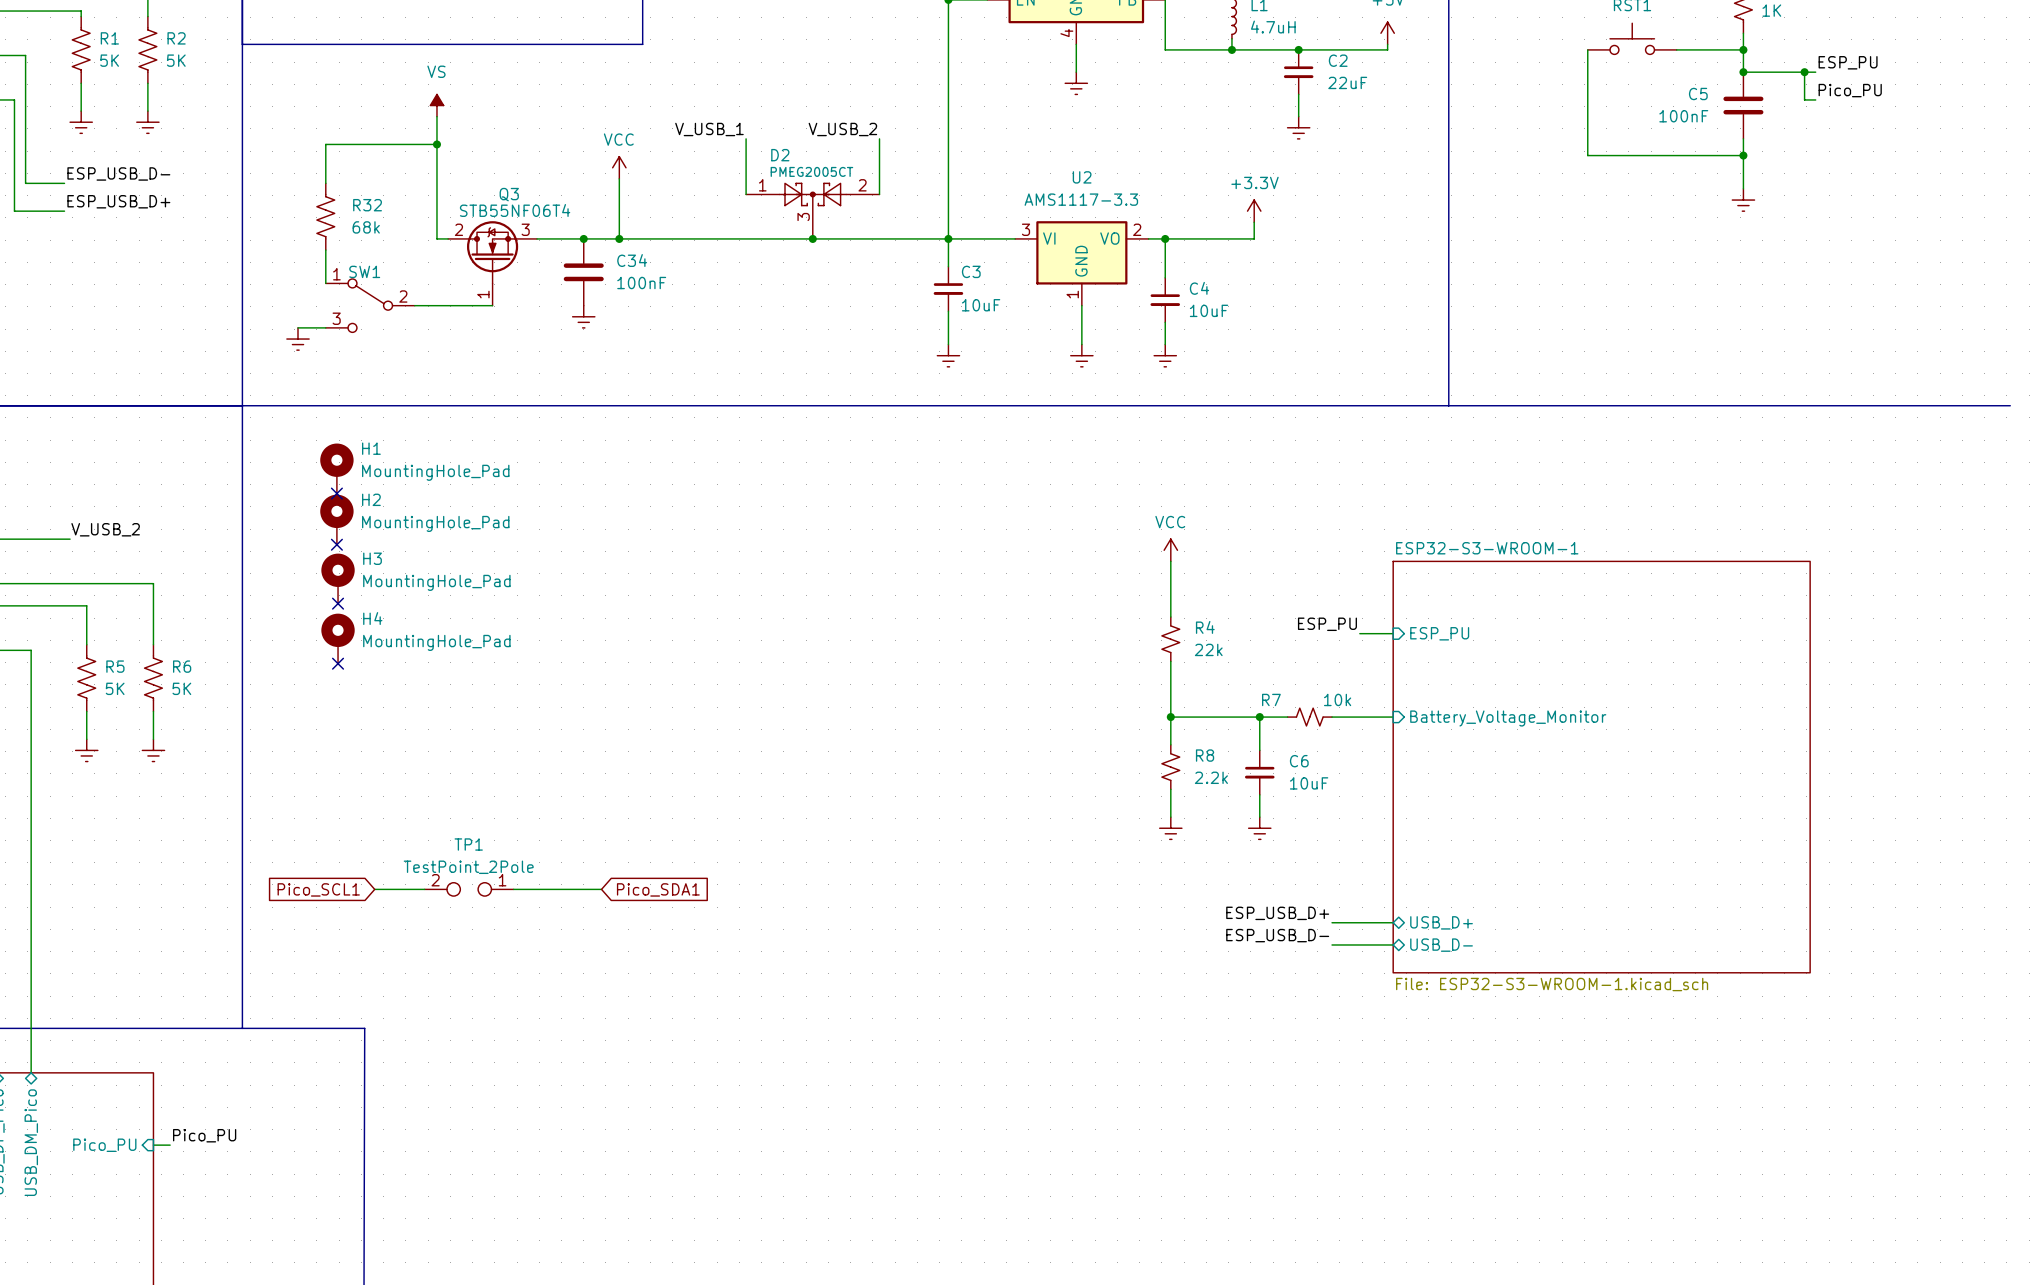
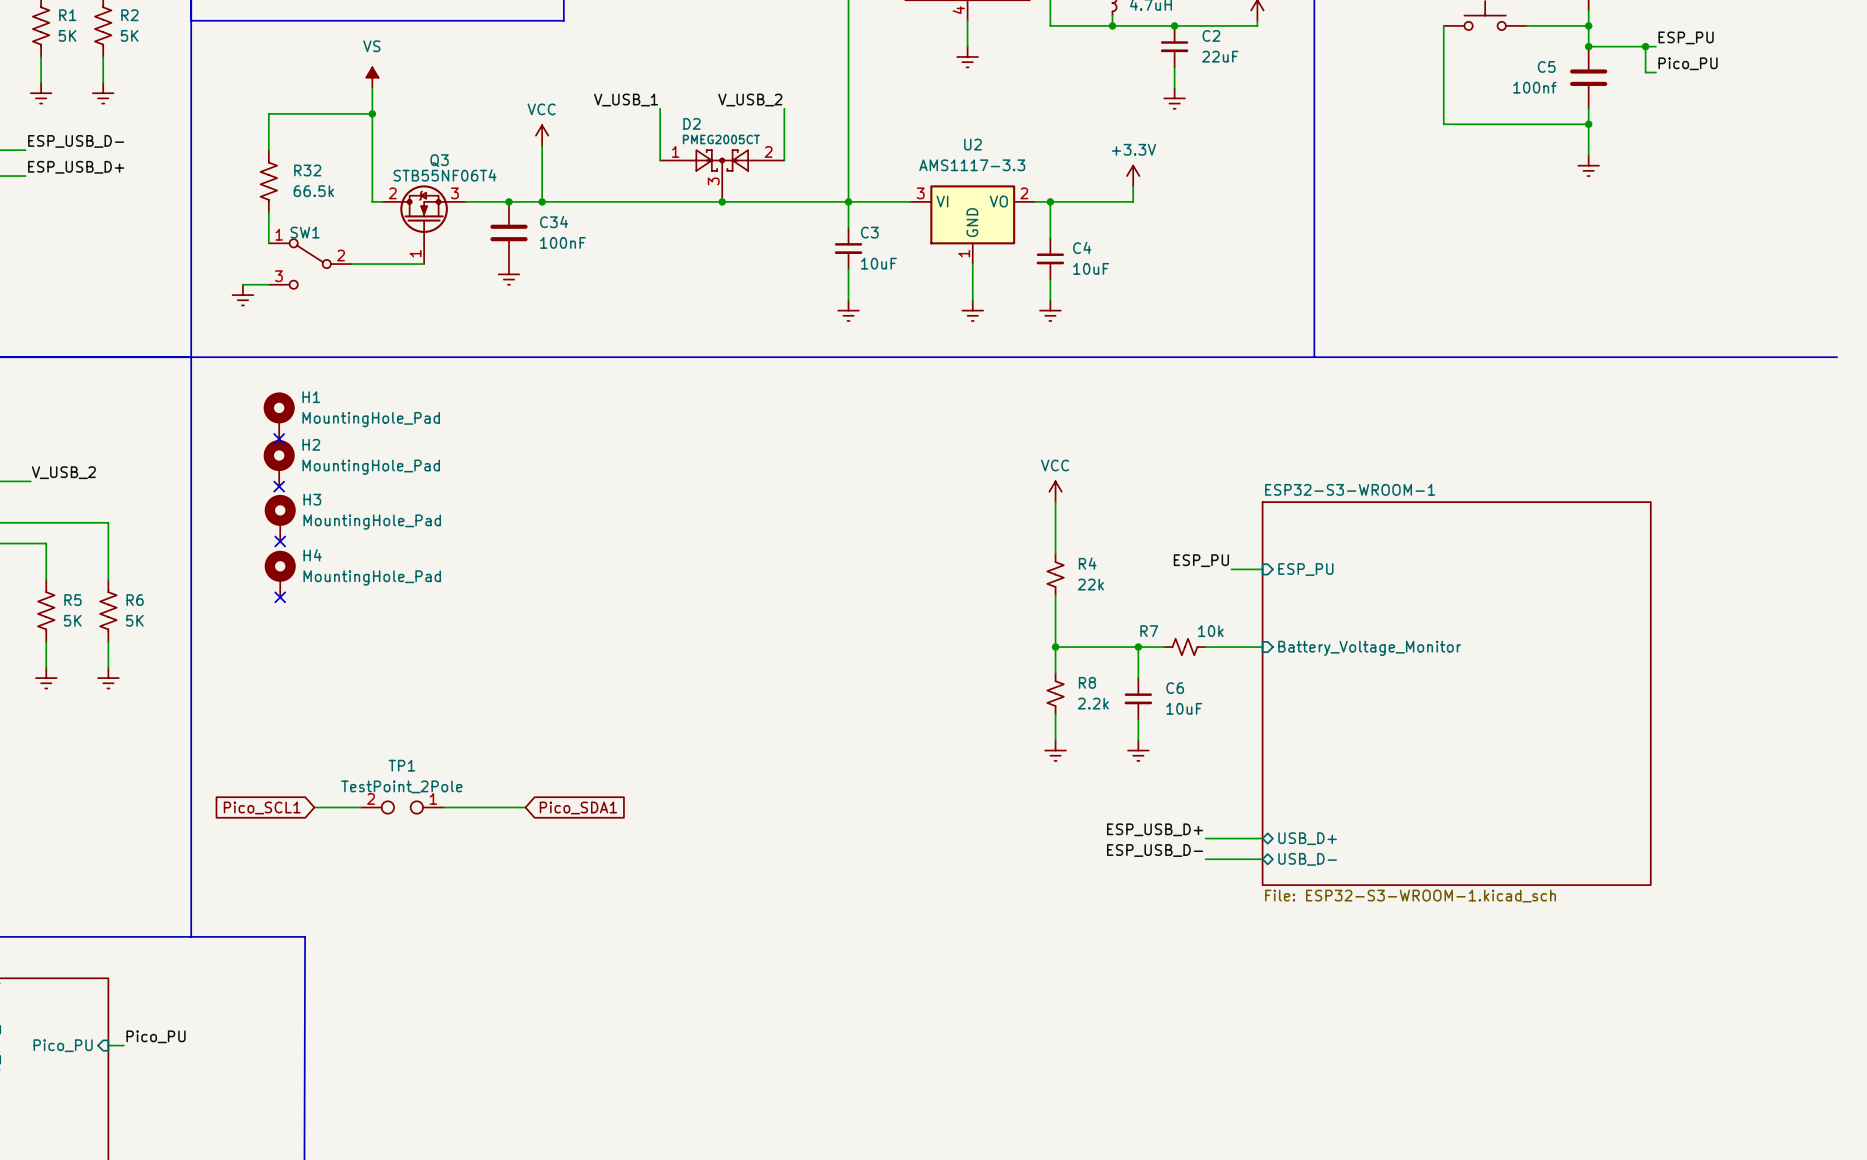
C5 value: 100nF (1683, 116) -> 100nf (1534, 87)
R32 value: 68k (366, 227) -> 66.5k (313, 191)

